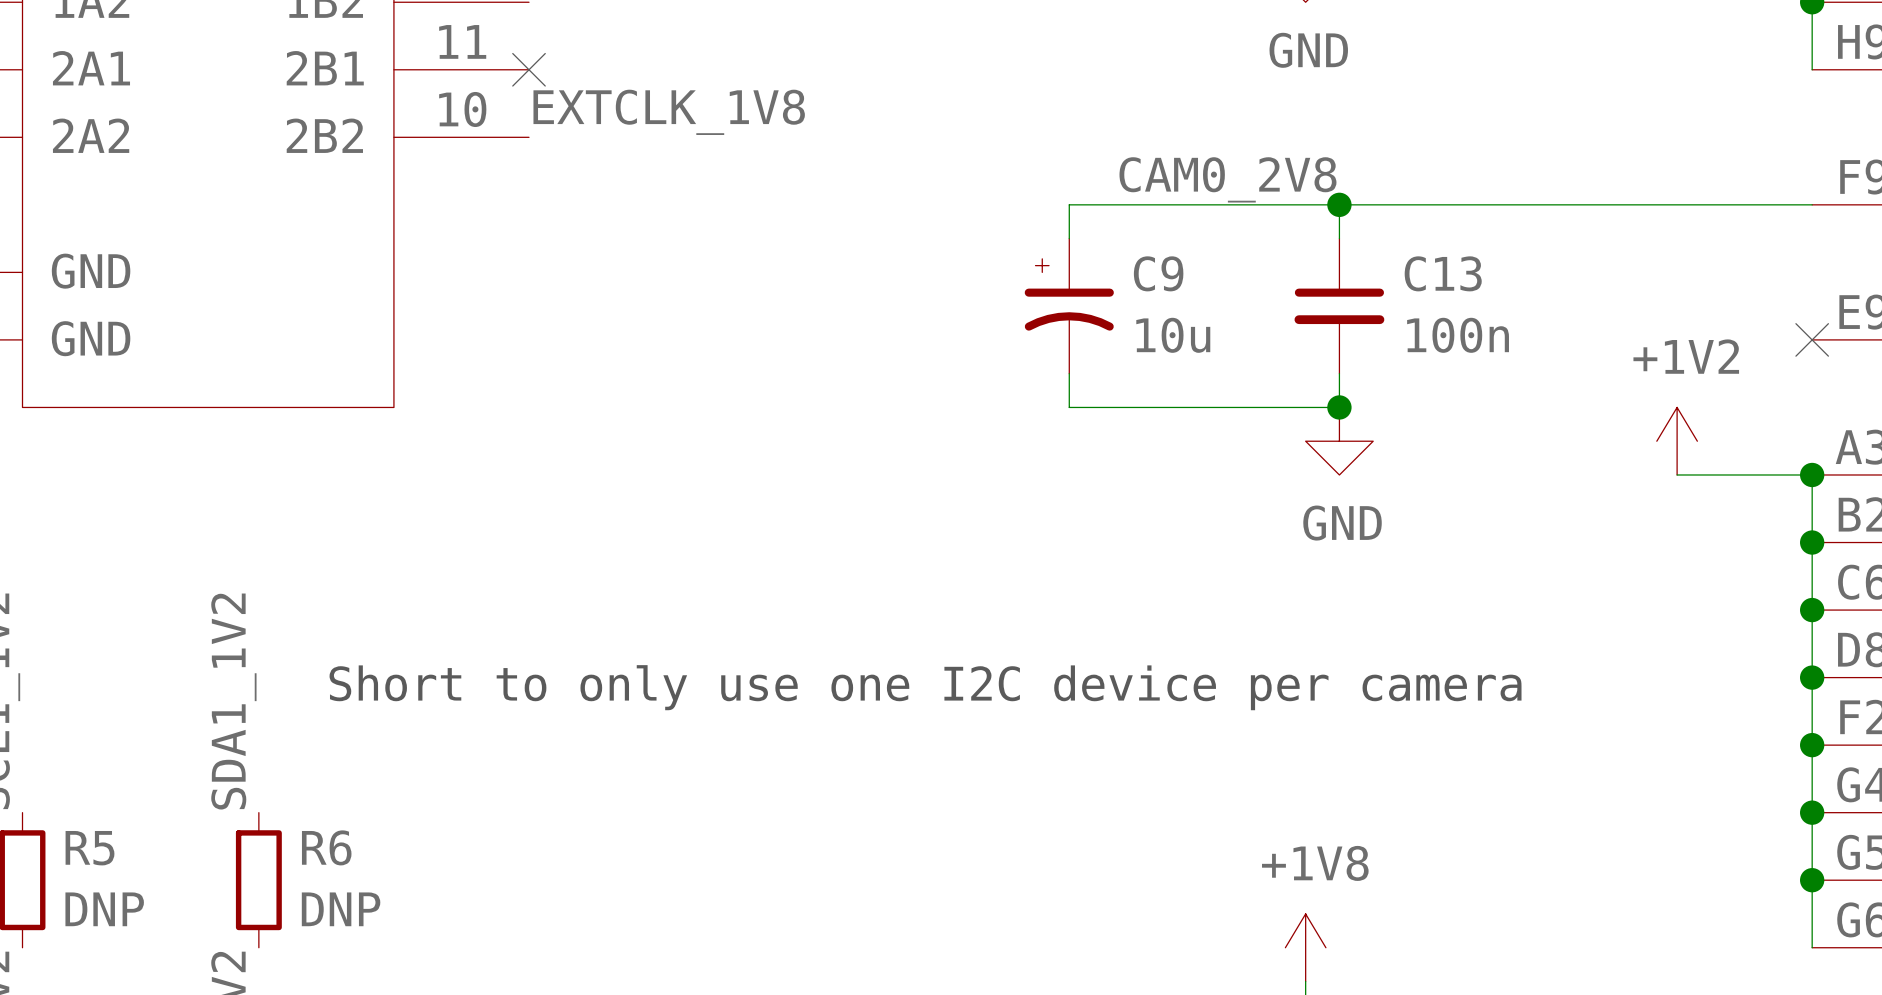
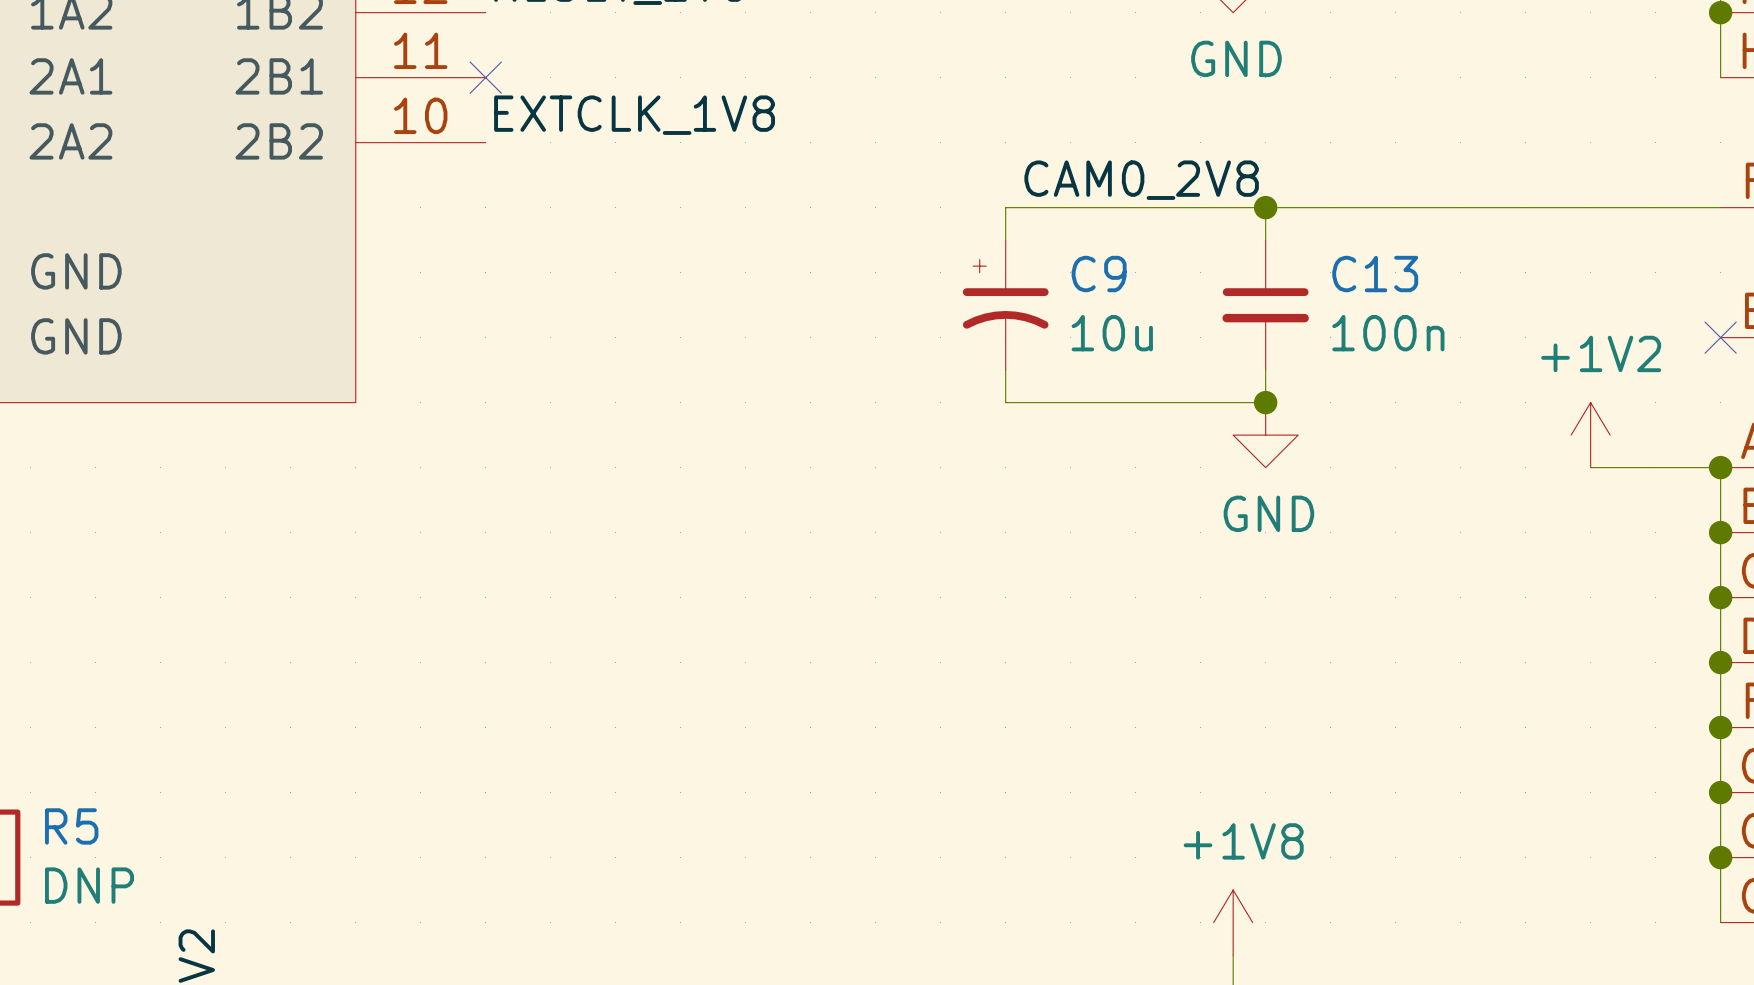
text: Short to only use one I2C device per camera (925, 687) -> none
label: SDA1_1V2 (233, 701) -> none
R6: DNP (258, 880) -> none

